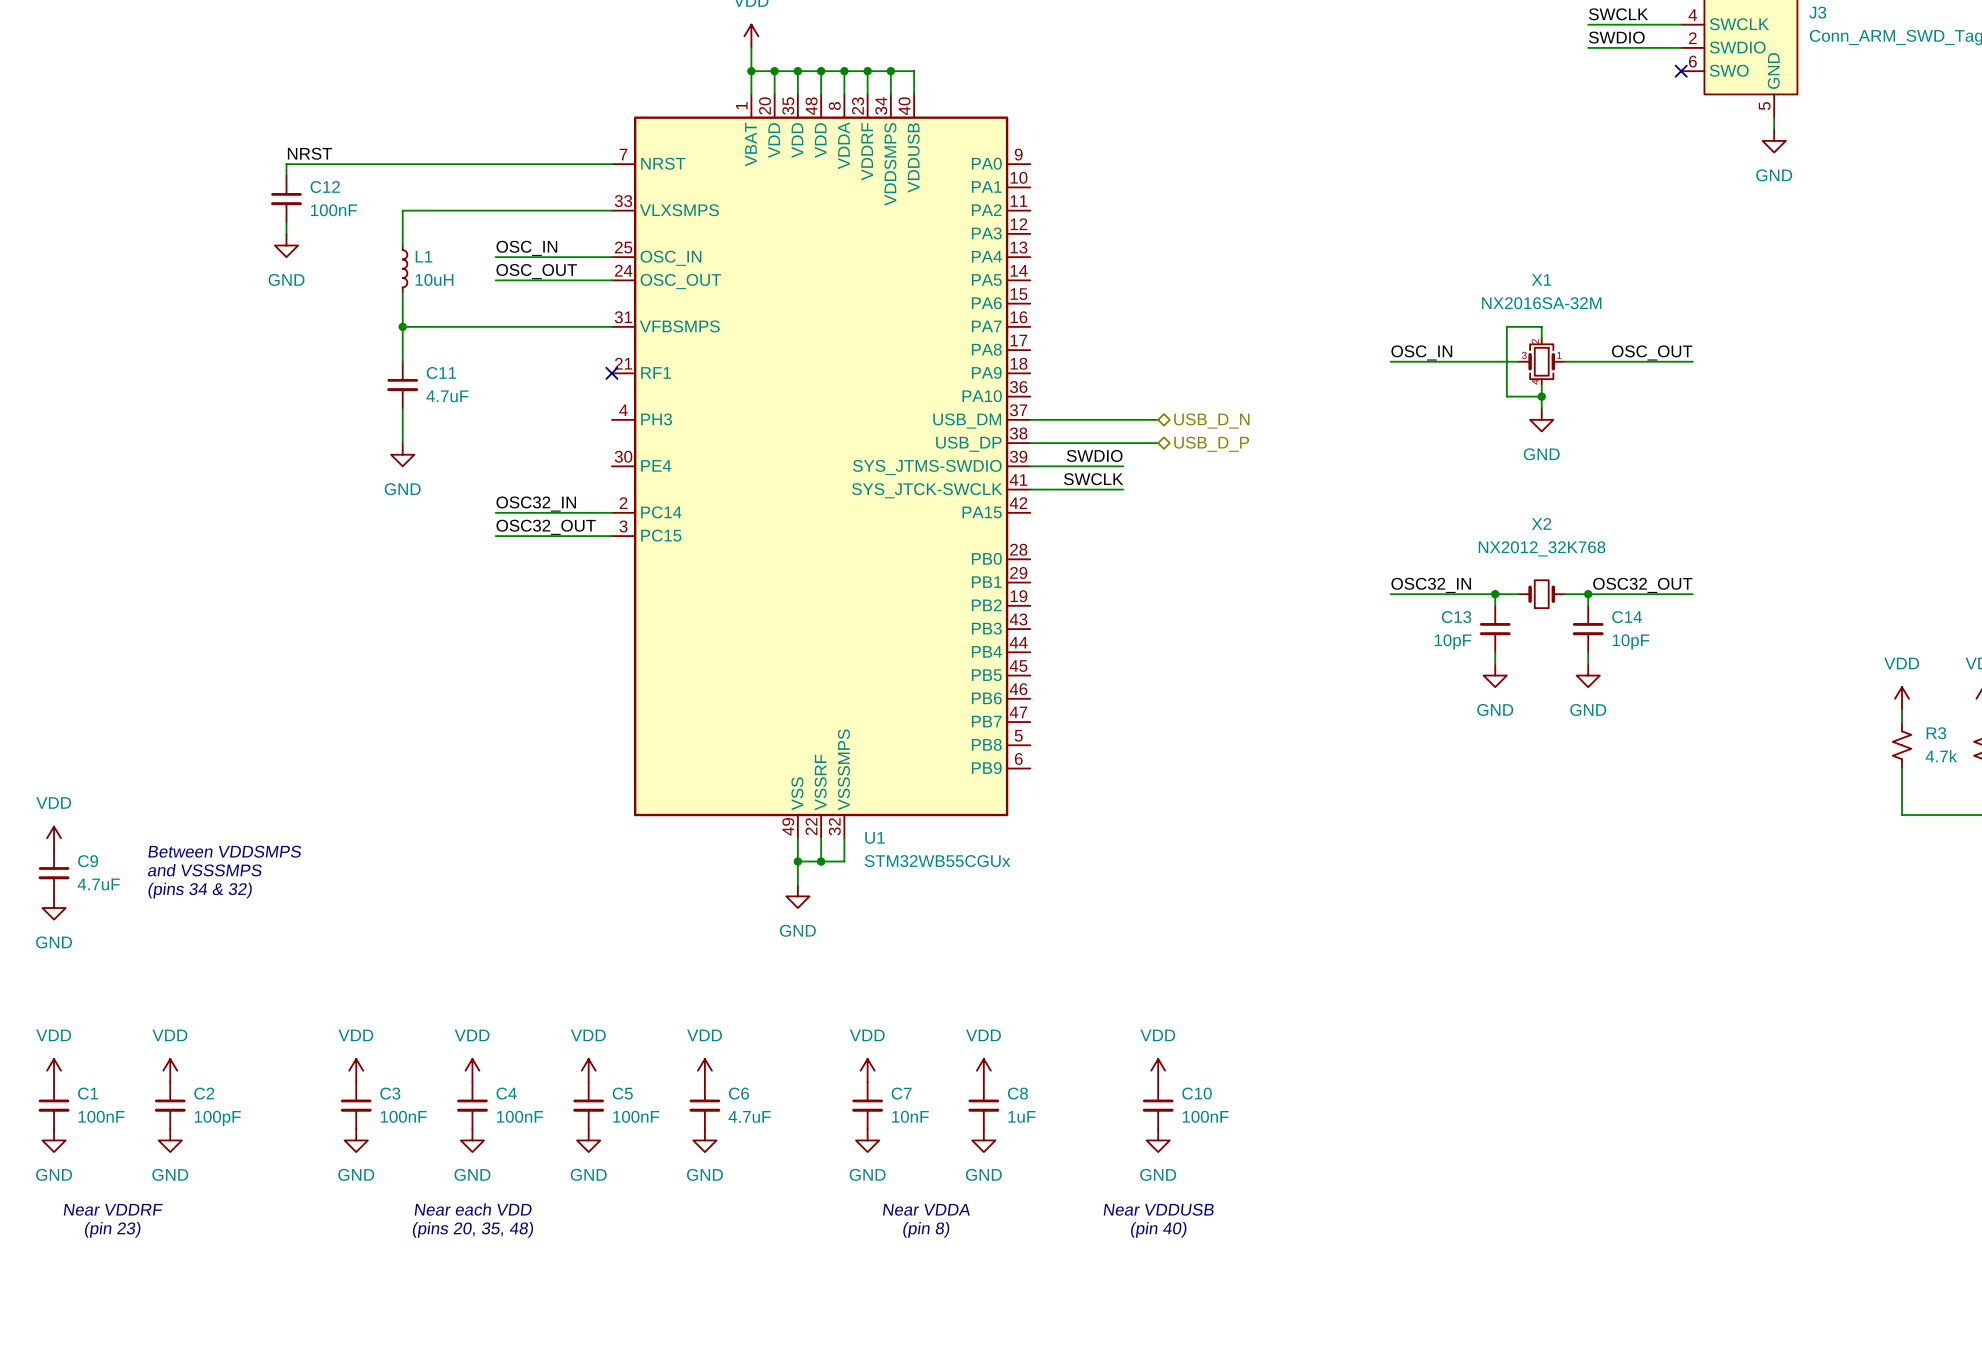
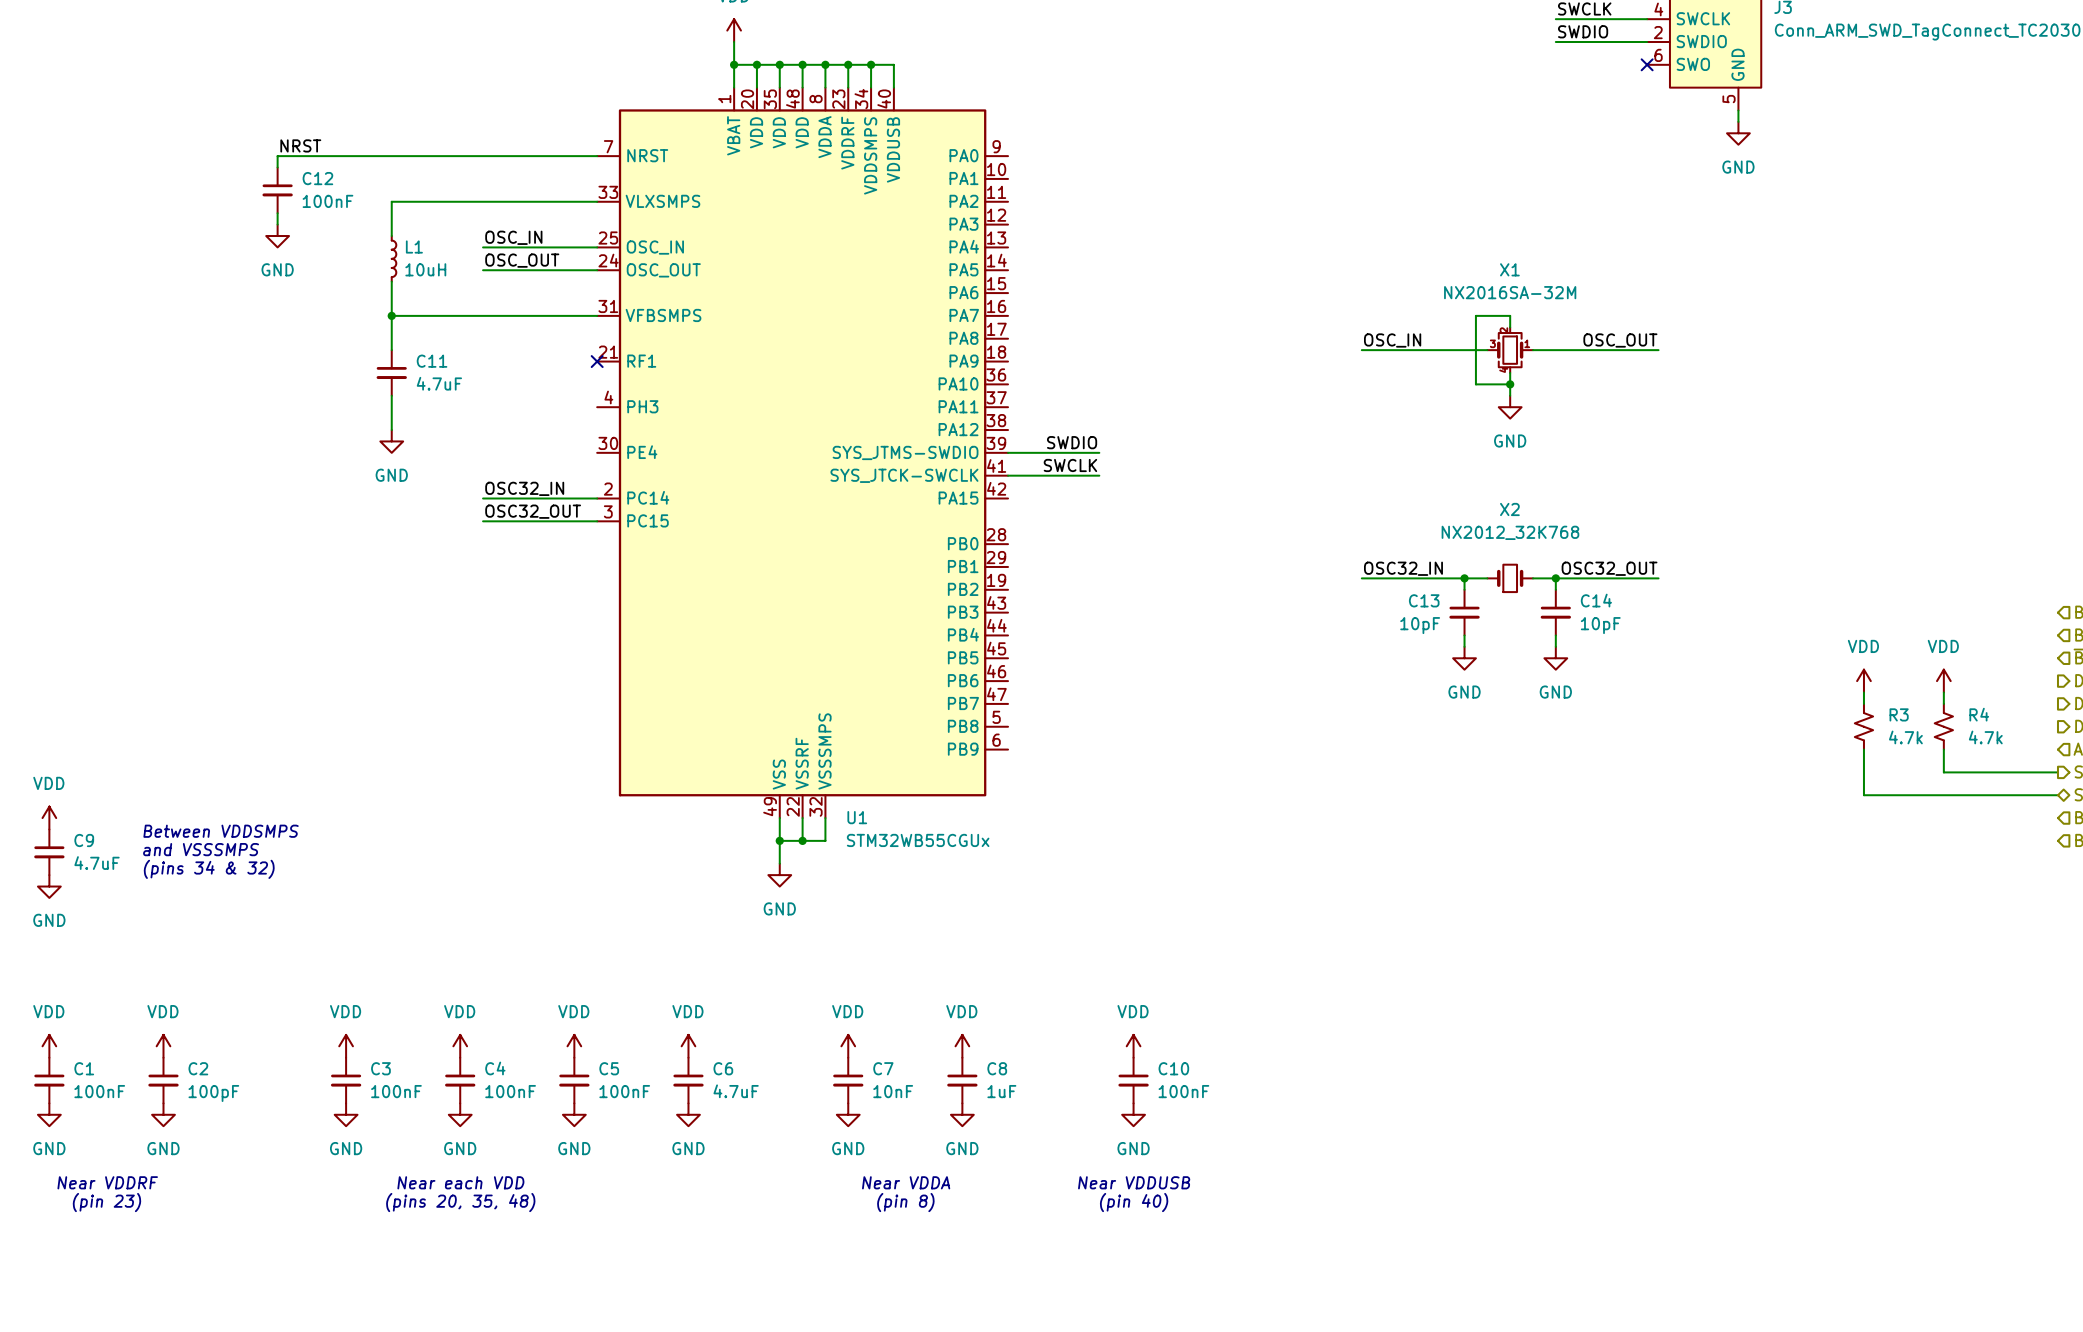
wire: (1030, 419) (1158, 419) -> none
U1 pin name: USB_DM (967, 421) -> PA11 (958, 406)
hierarchical label: USB_D_N (1211, 421) -> none
wire: (1030, 443) (1158, 443) -> none
U1 pin name: USB_DP (968, 444) -> PA12 (958, 429)
hierarchical label: USB_D_P (1211, 444) -> none

